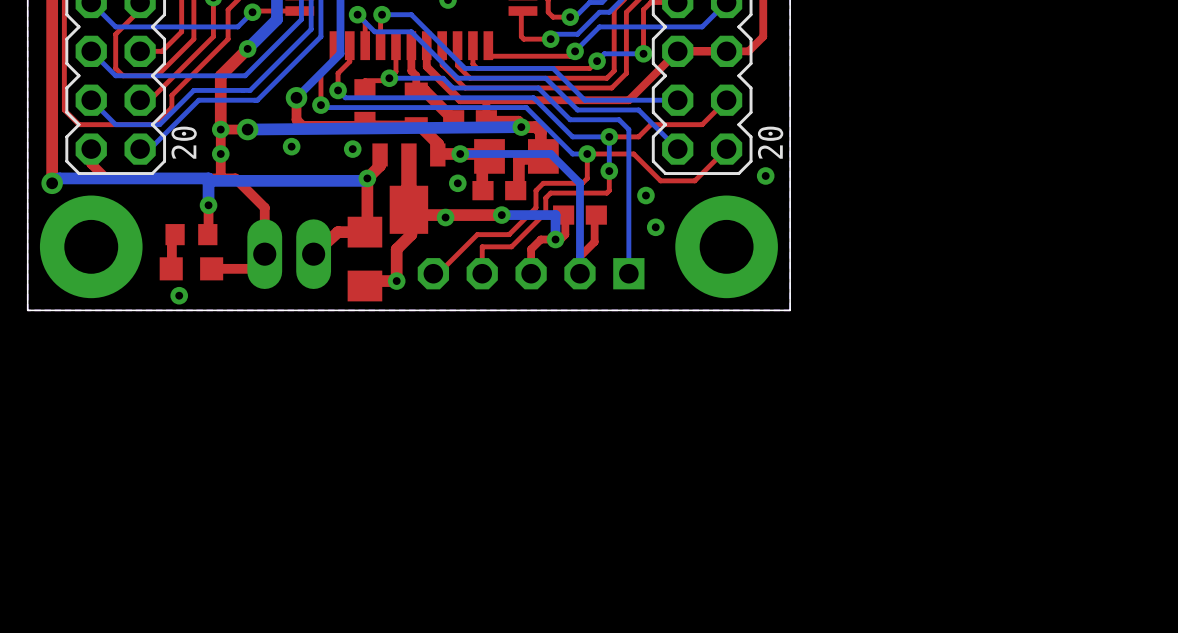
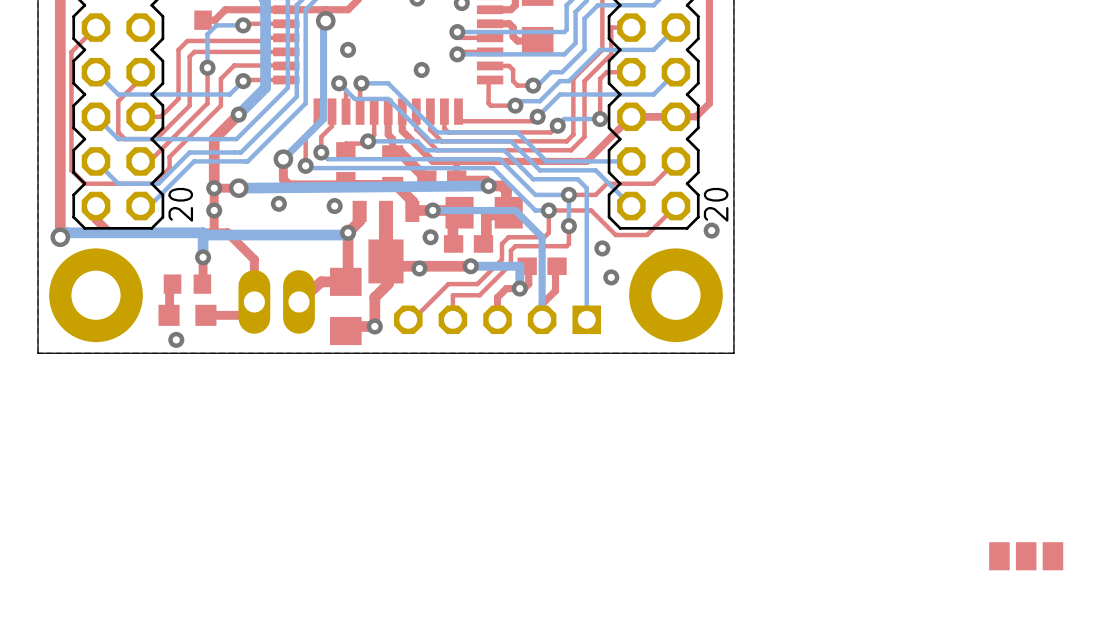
part: none -> (1026, 556)

